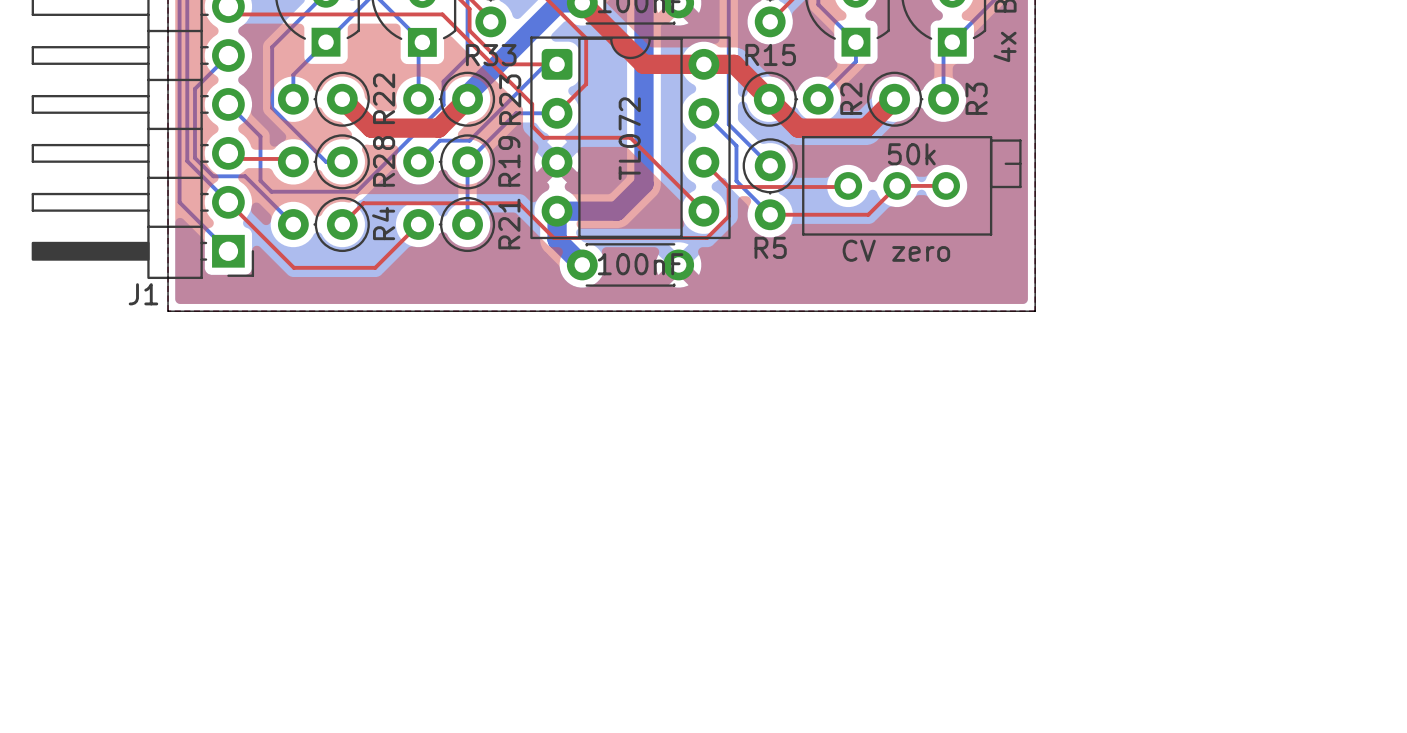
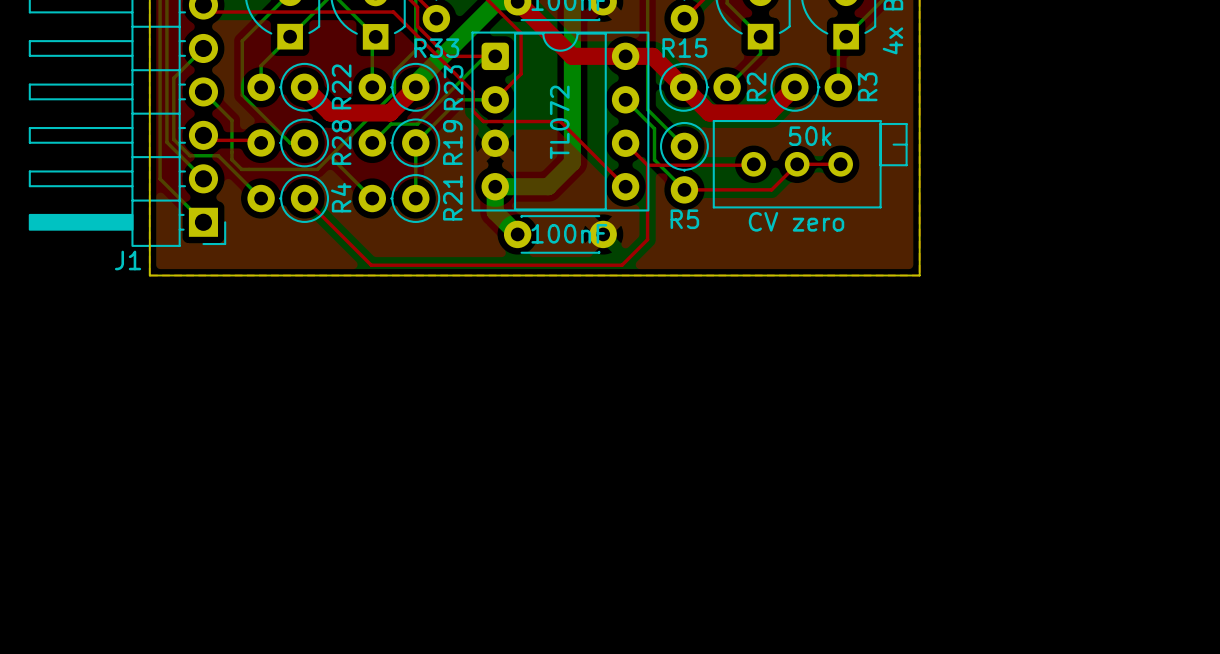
bottom track: none -> (330, 156) (372, 198)
top track: (228, 202) (293, 267) (375, 267) (418, 224) -> none
top track: (728, 216) (707, 237) (553, 237) (519, 203) (363, 203) (342, 224) -> (647, 191) (647, 239) (622, 265) (371, 265) (304, 198)

